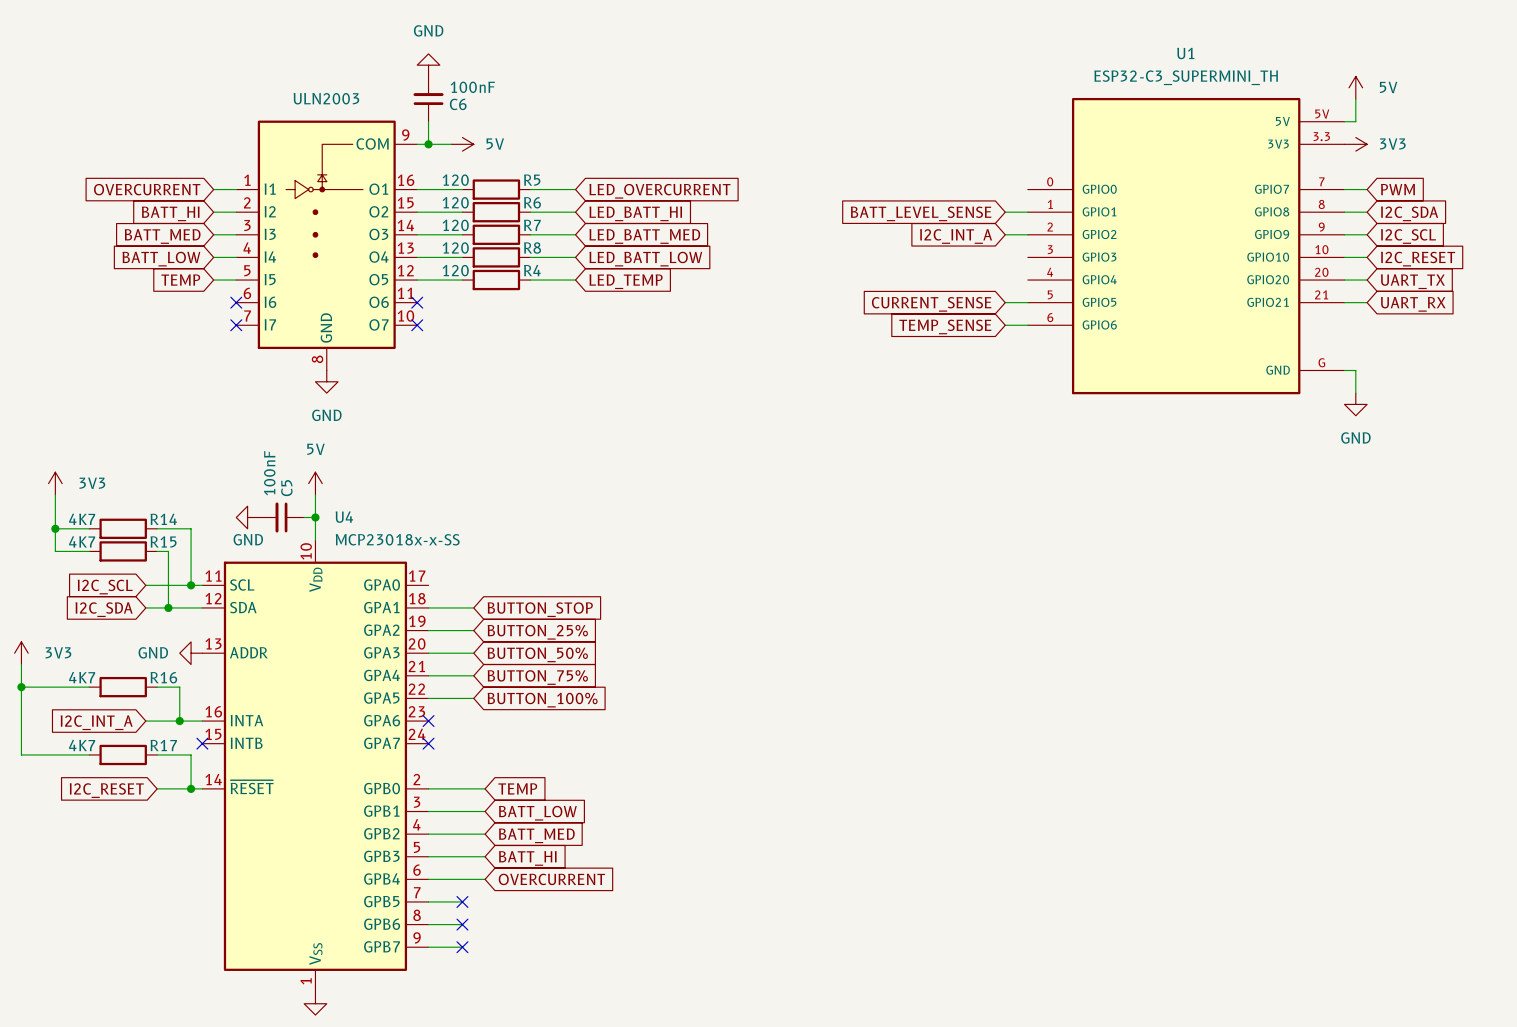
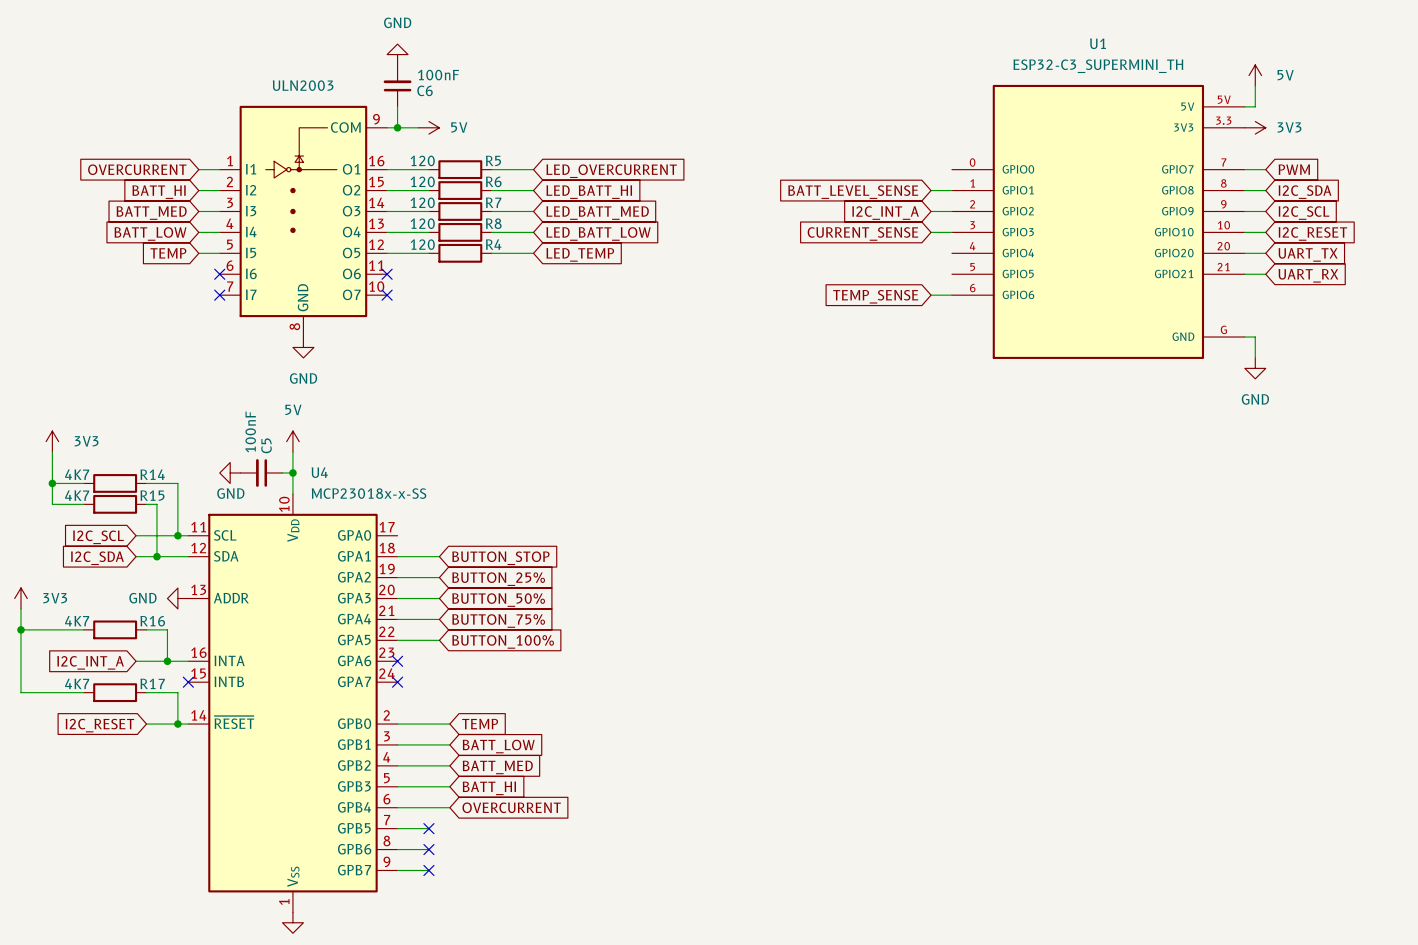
wire: (1005, 302) (1027, 302) -> (931, 232) (951, 232)
global label position: CURRENT_SENSE (931, 304) -> CURRENT_SENSE (862, 233)

